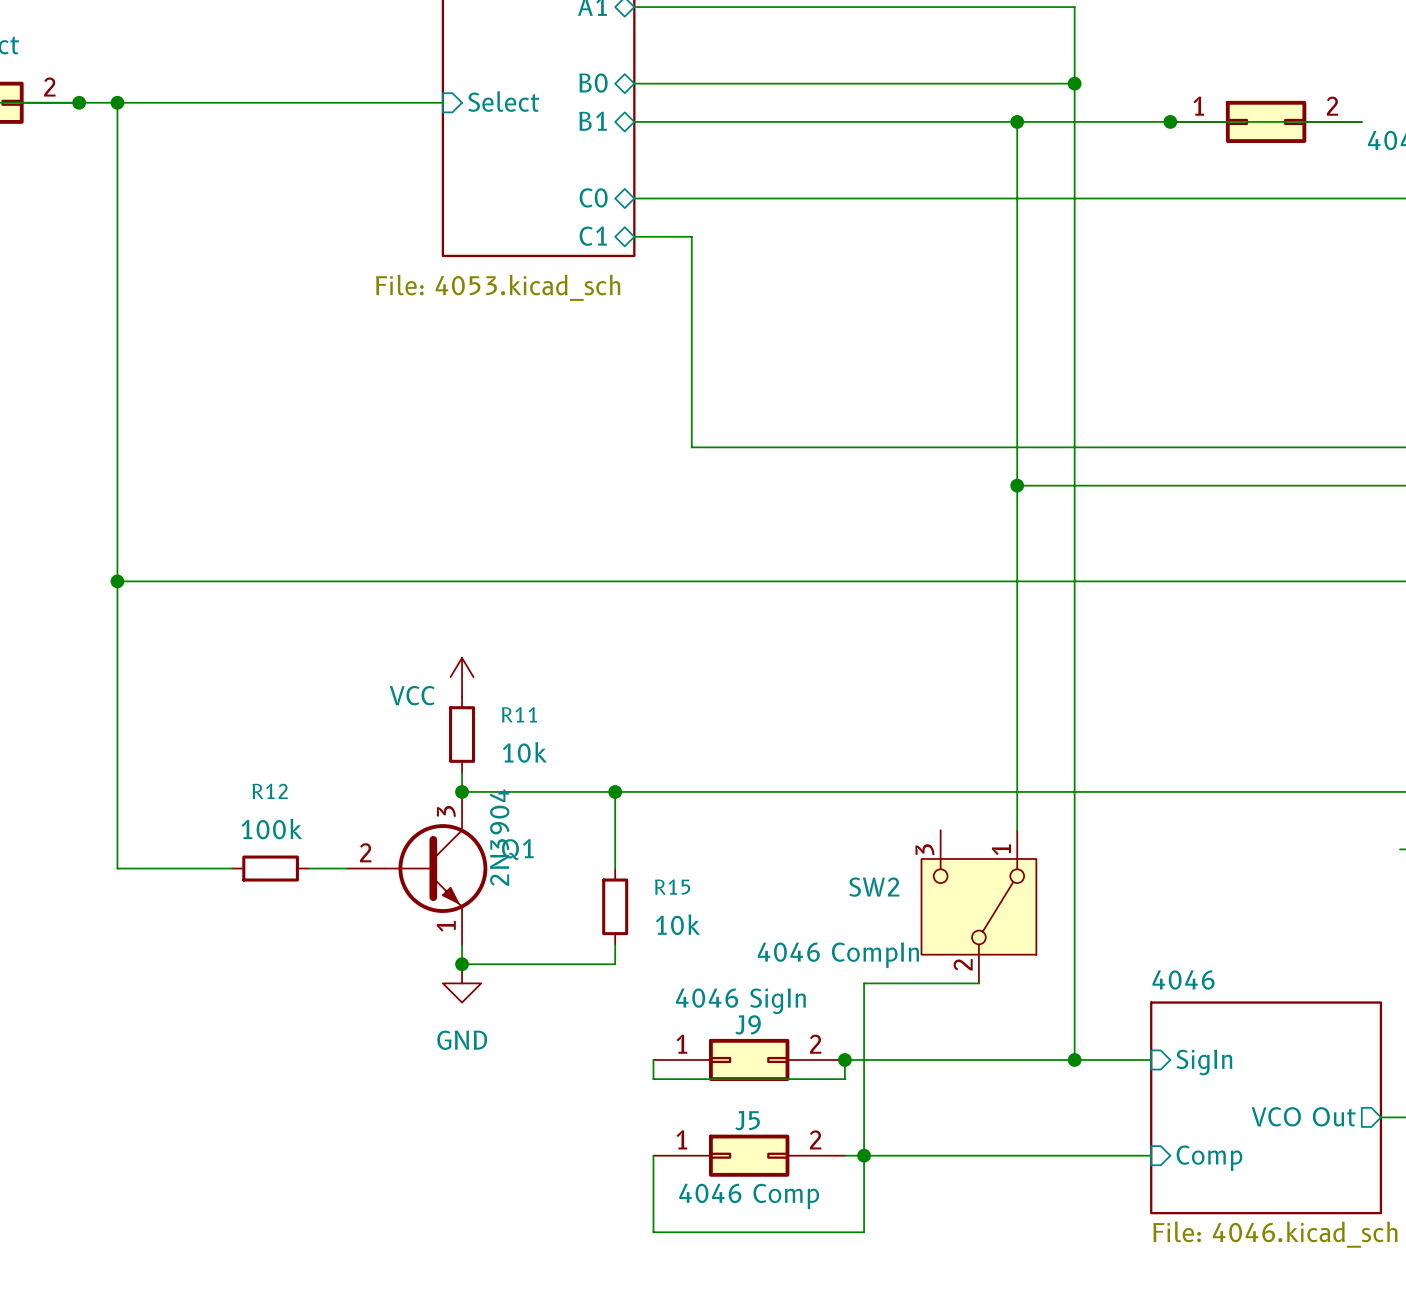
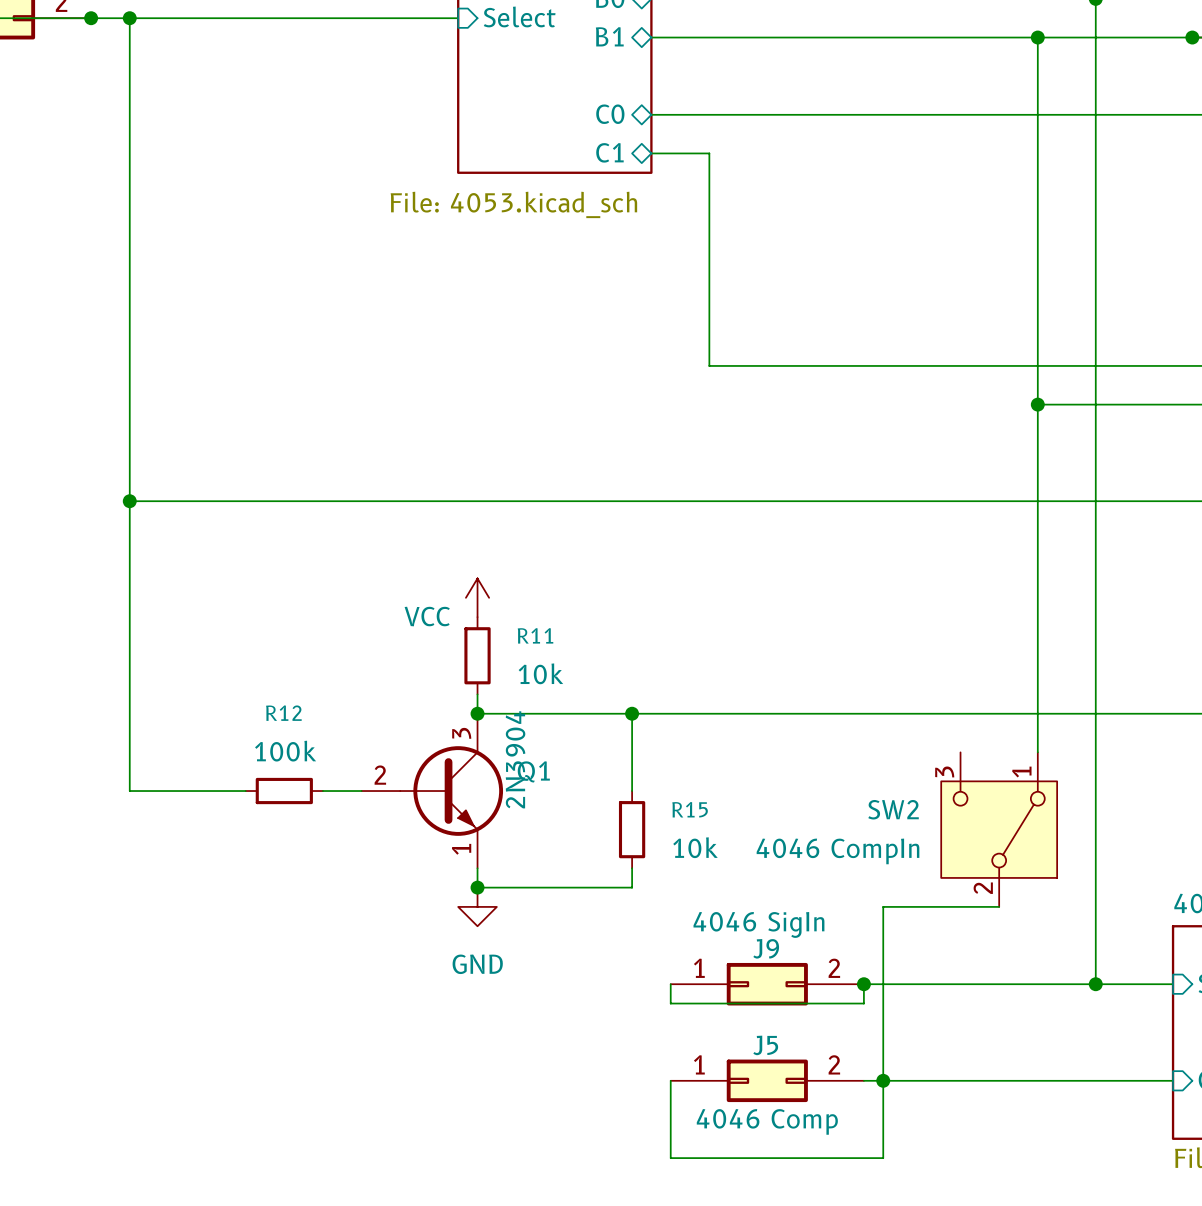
SW2 value position: 4046 CompIn (838, 955) -> 4046 CompIn (837, 851)

